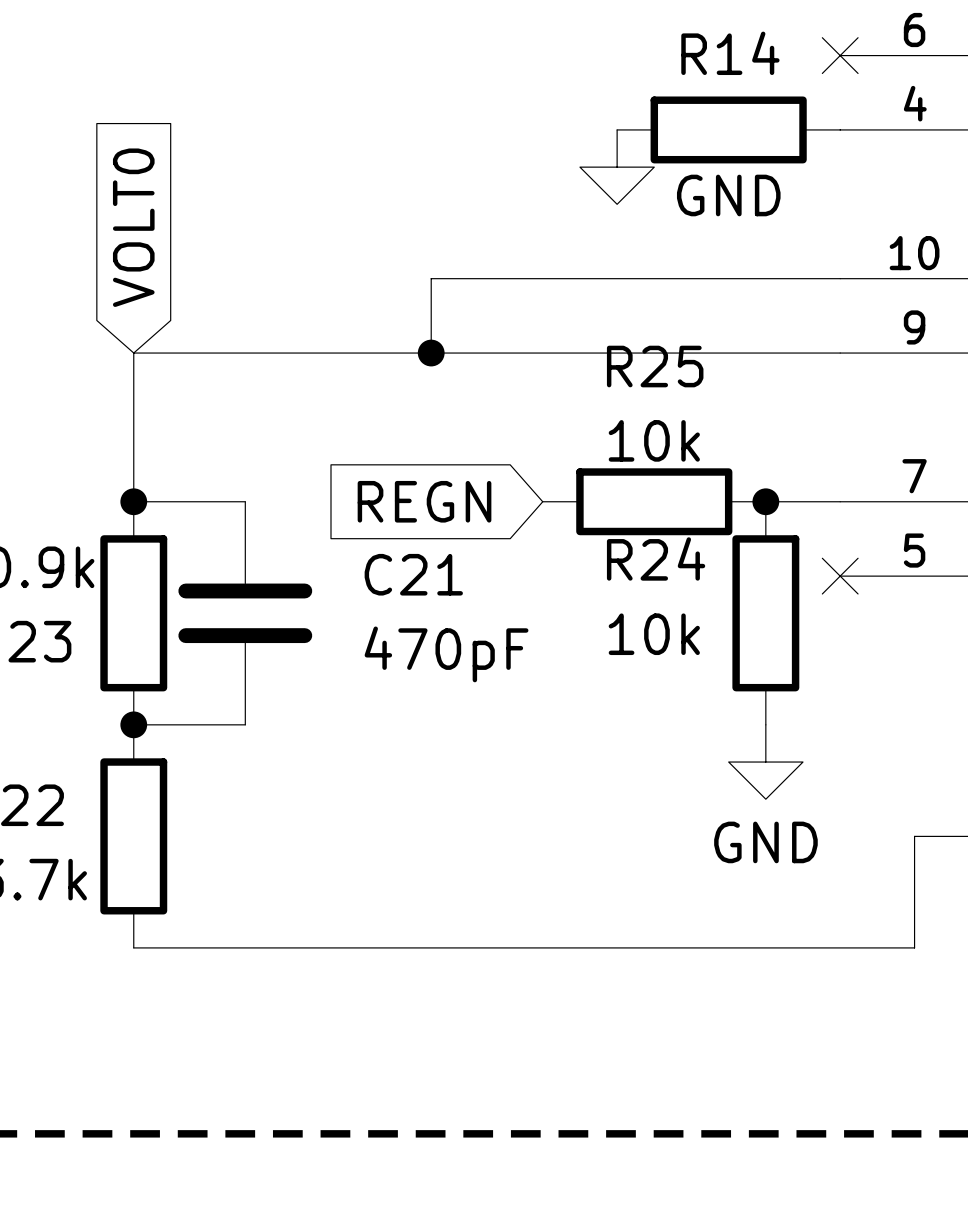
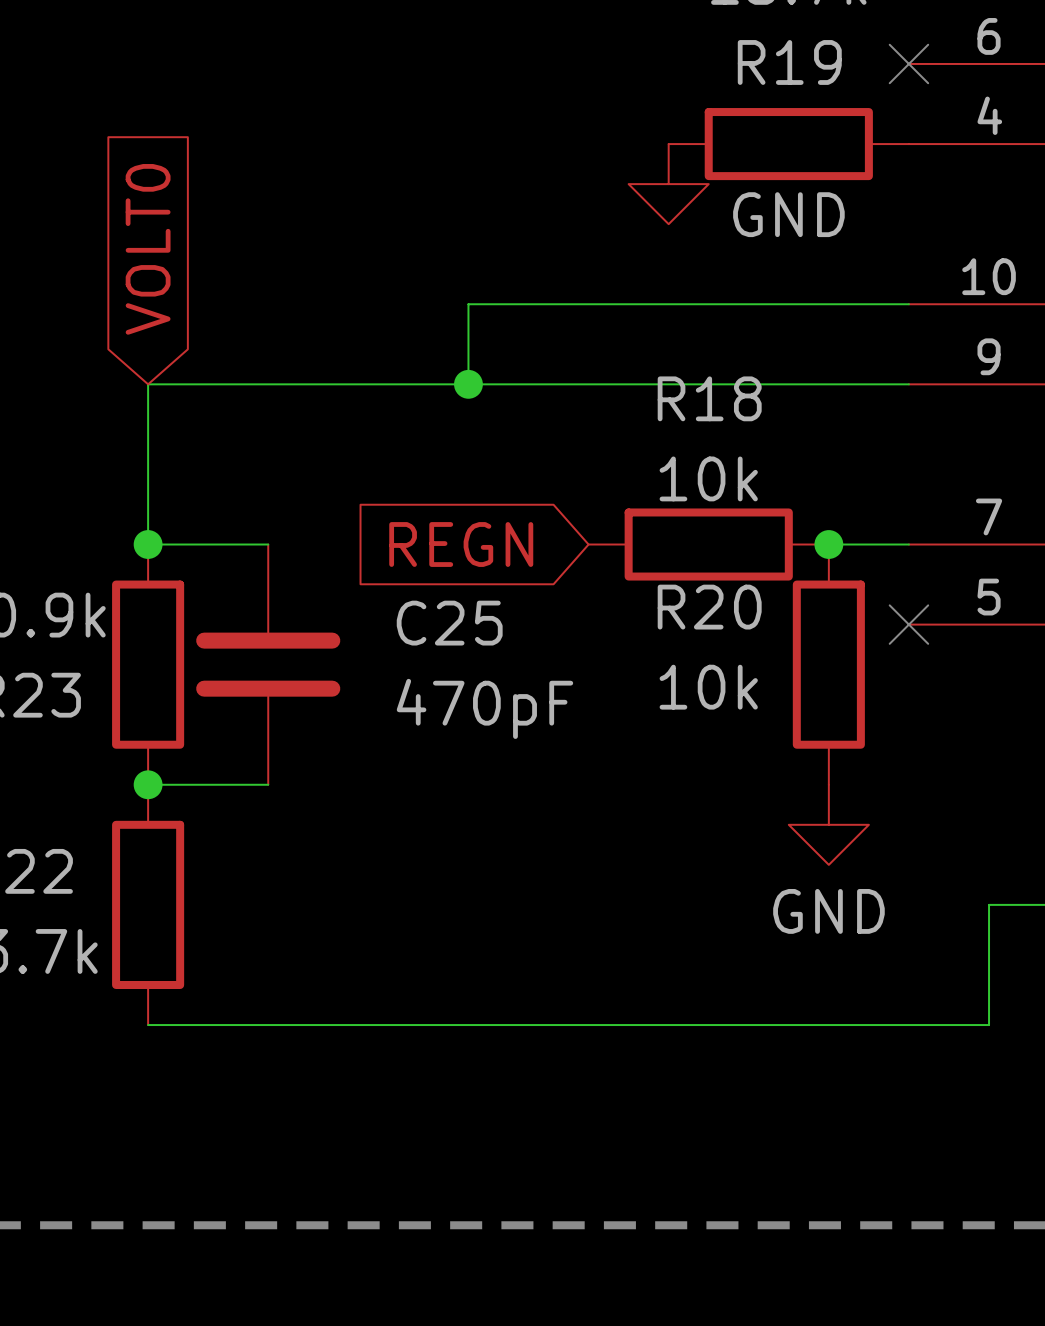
R14 name: R14 (730, 53) -> R19 (789, 62)
R25 name: R25 (655, 366) -> R18 (709, 398)
R24 name: R24 (656, 558) -> R20 (709, 607)
C21 name: C21 (413, 574) -> C25 (449, 623)

